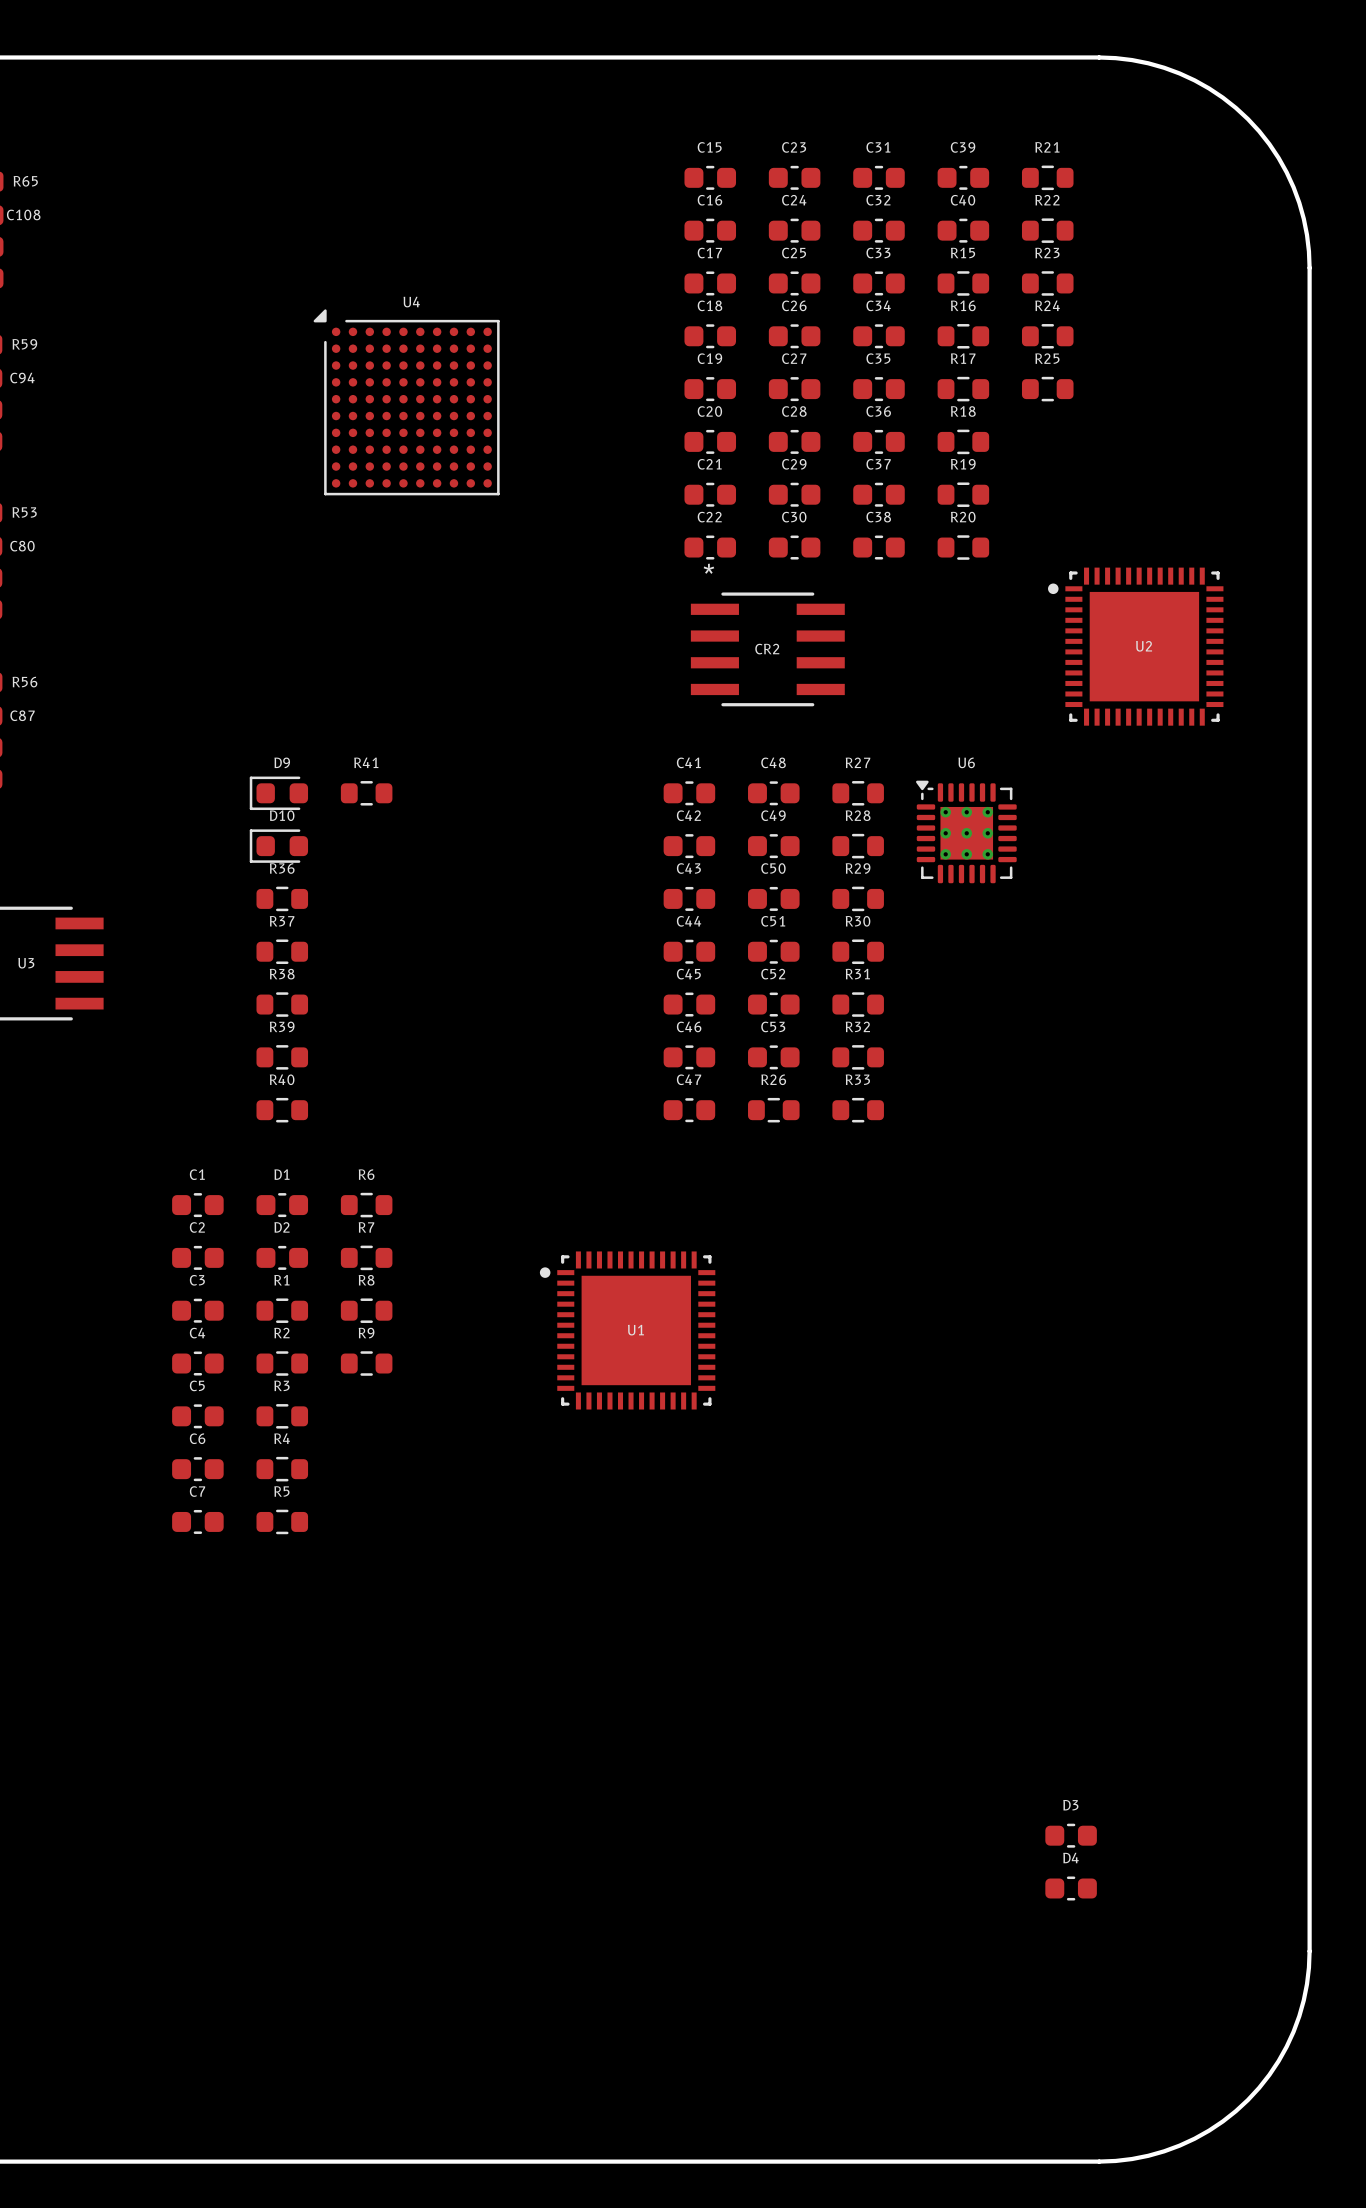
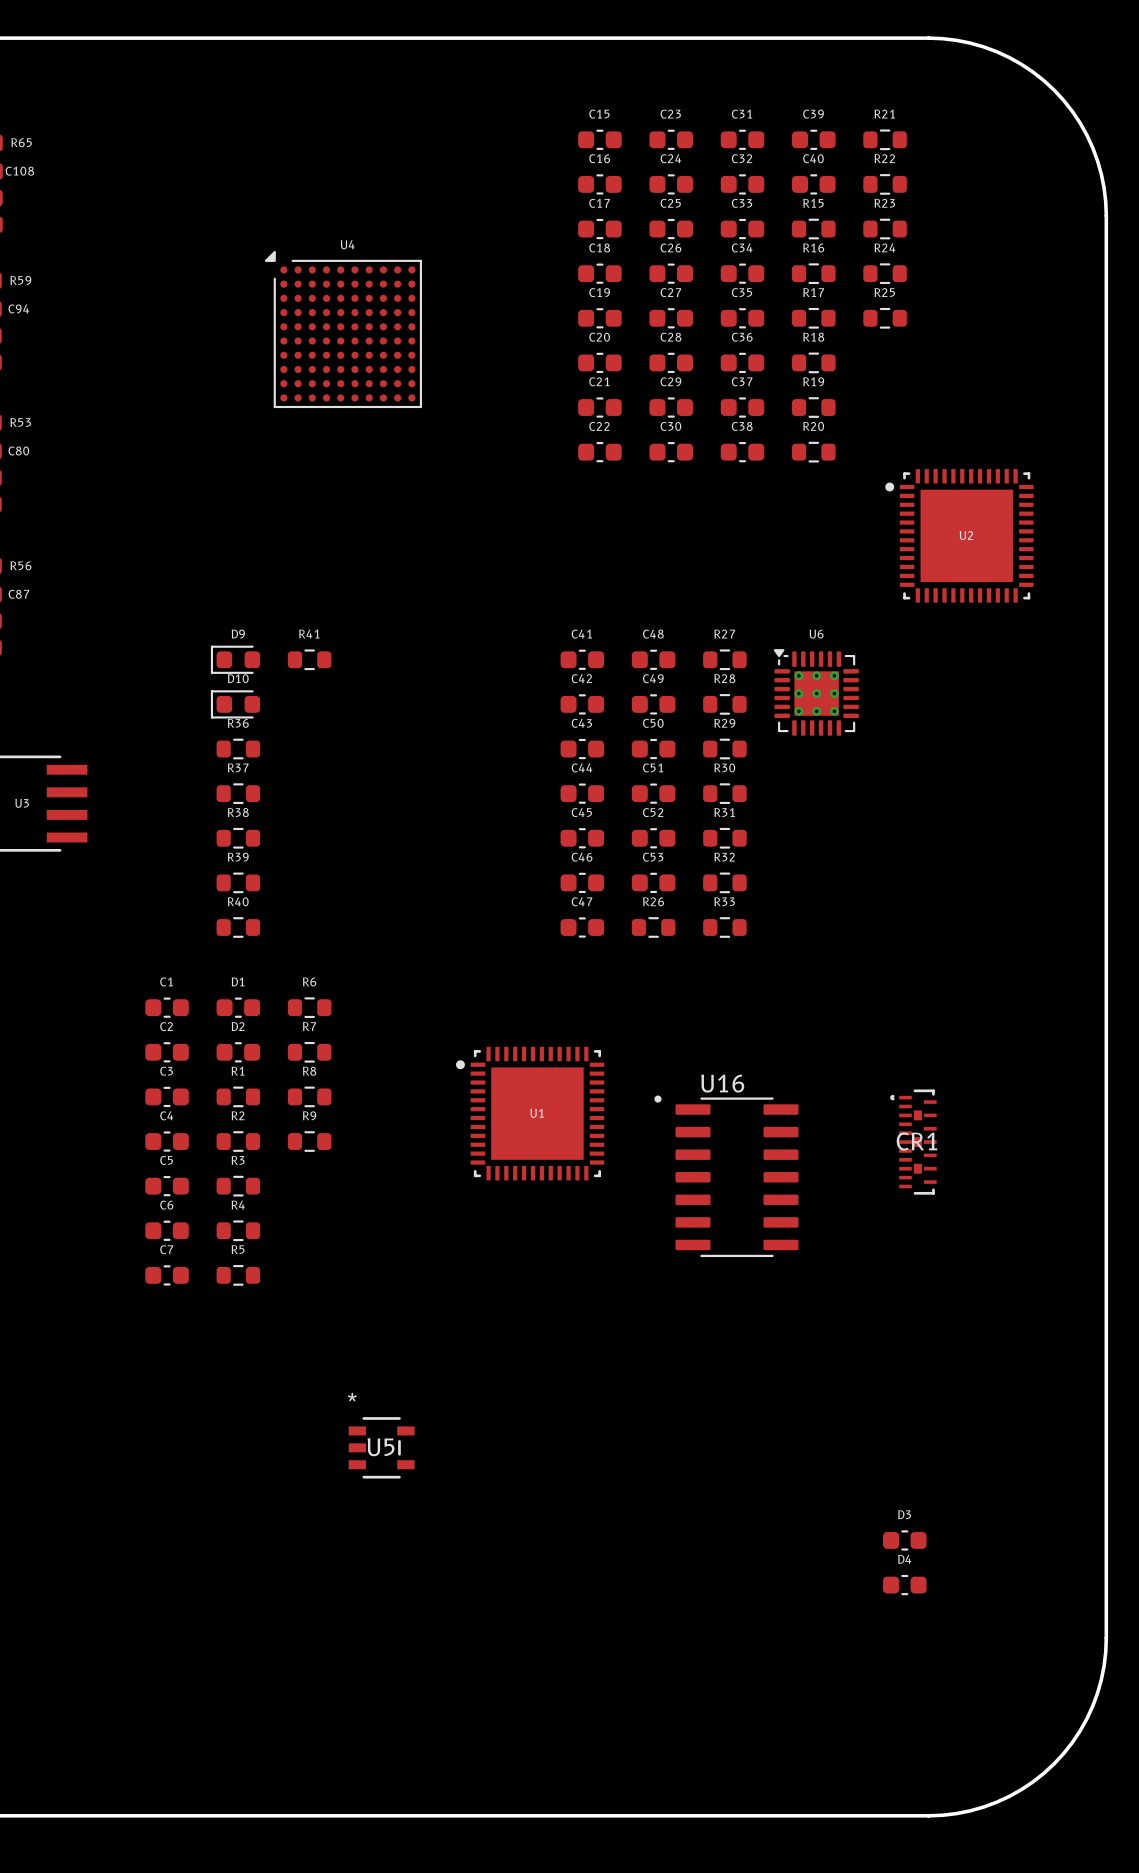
CR2: (767, 649) -> none
CR1: none -> (913, 1142)
U16: none -> (726, 1176)
U5: none -> (381, 1447)

